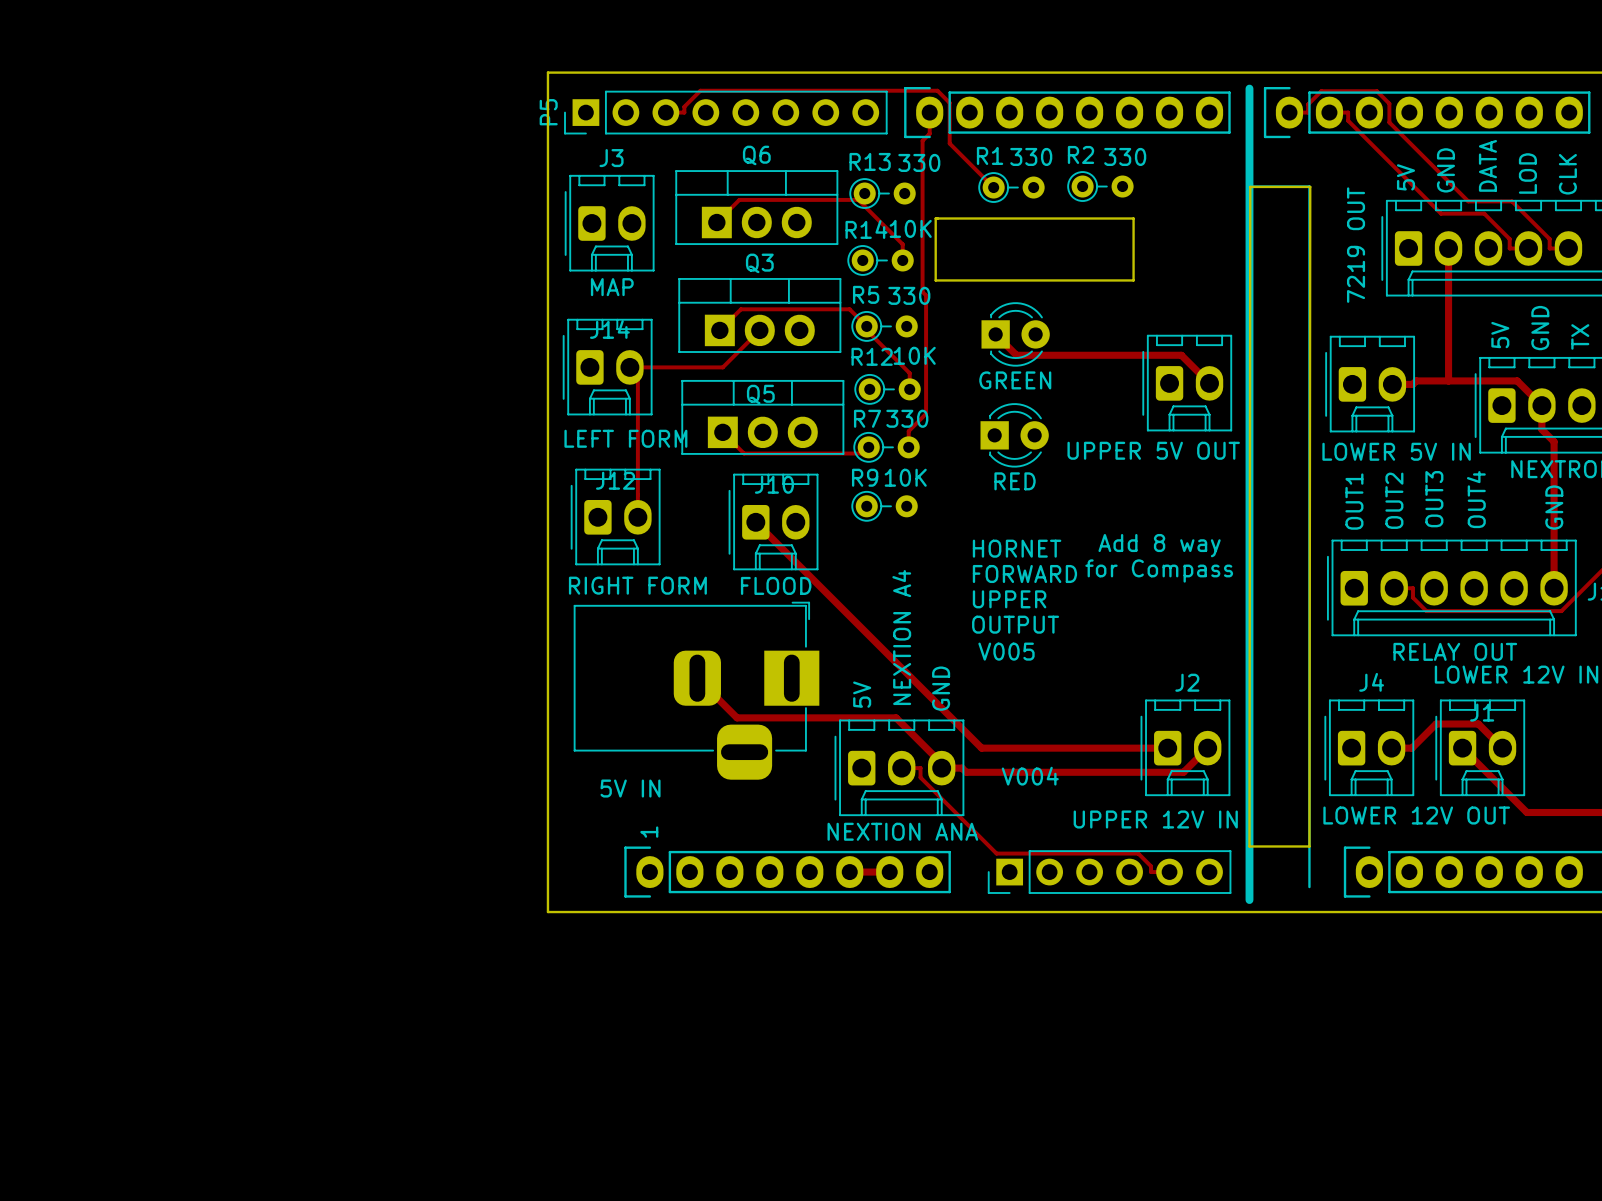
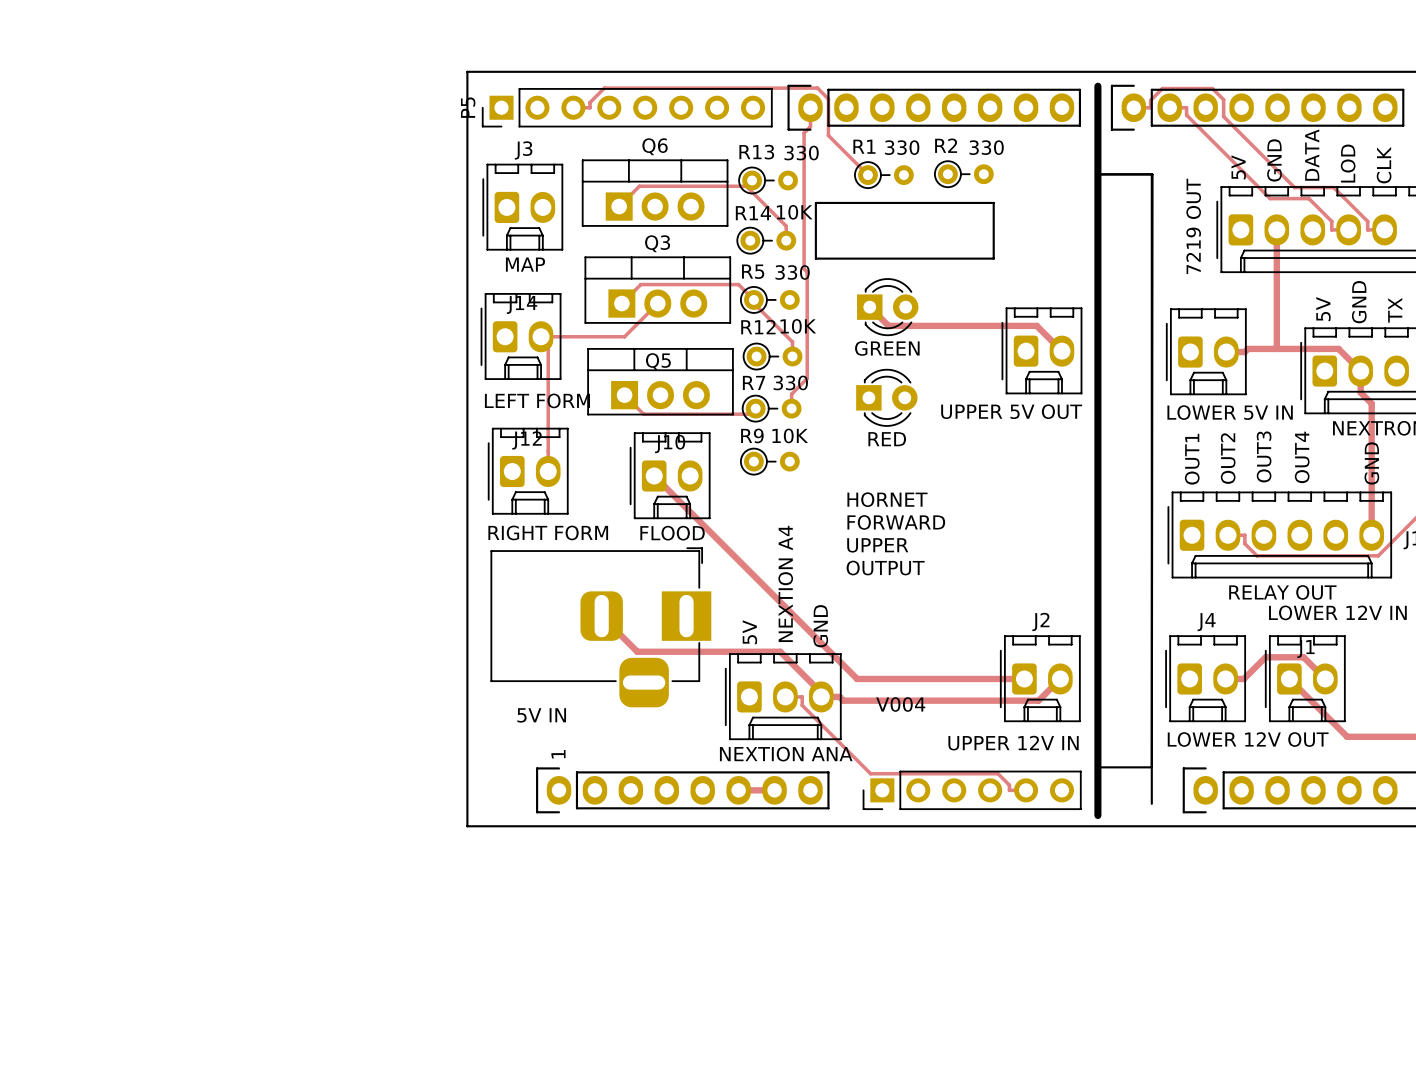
text: Add 8 way (1159, 545) -> none
text: for Compass (1159, 570) -> none
text: V005 (1006, 651) -> none

